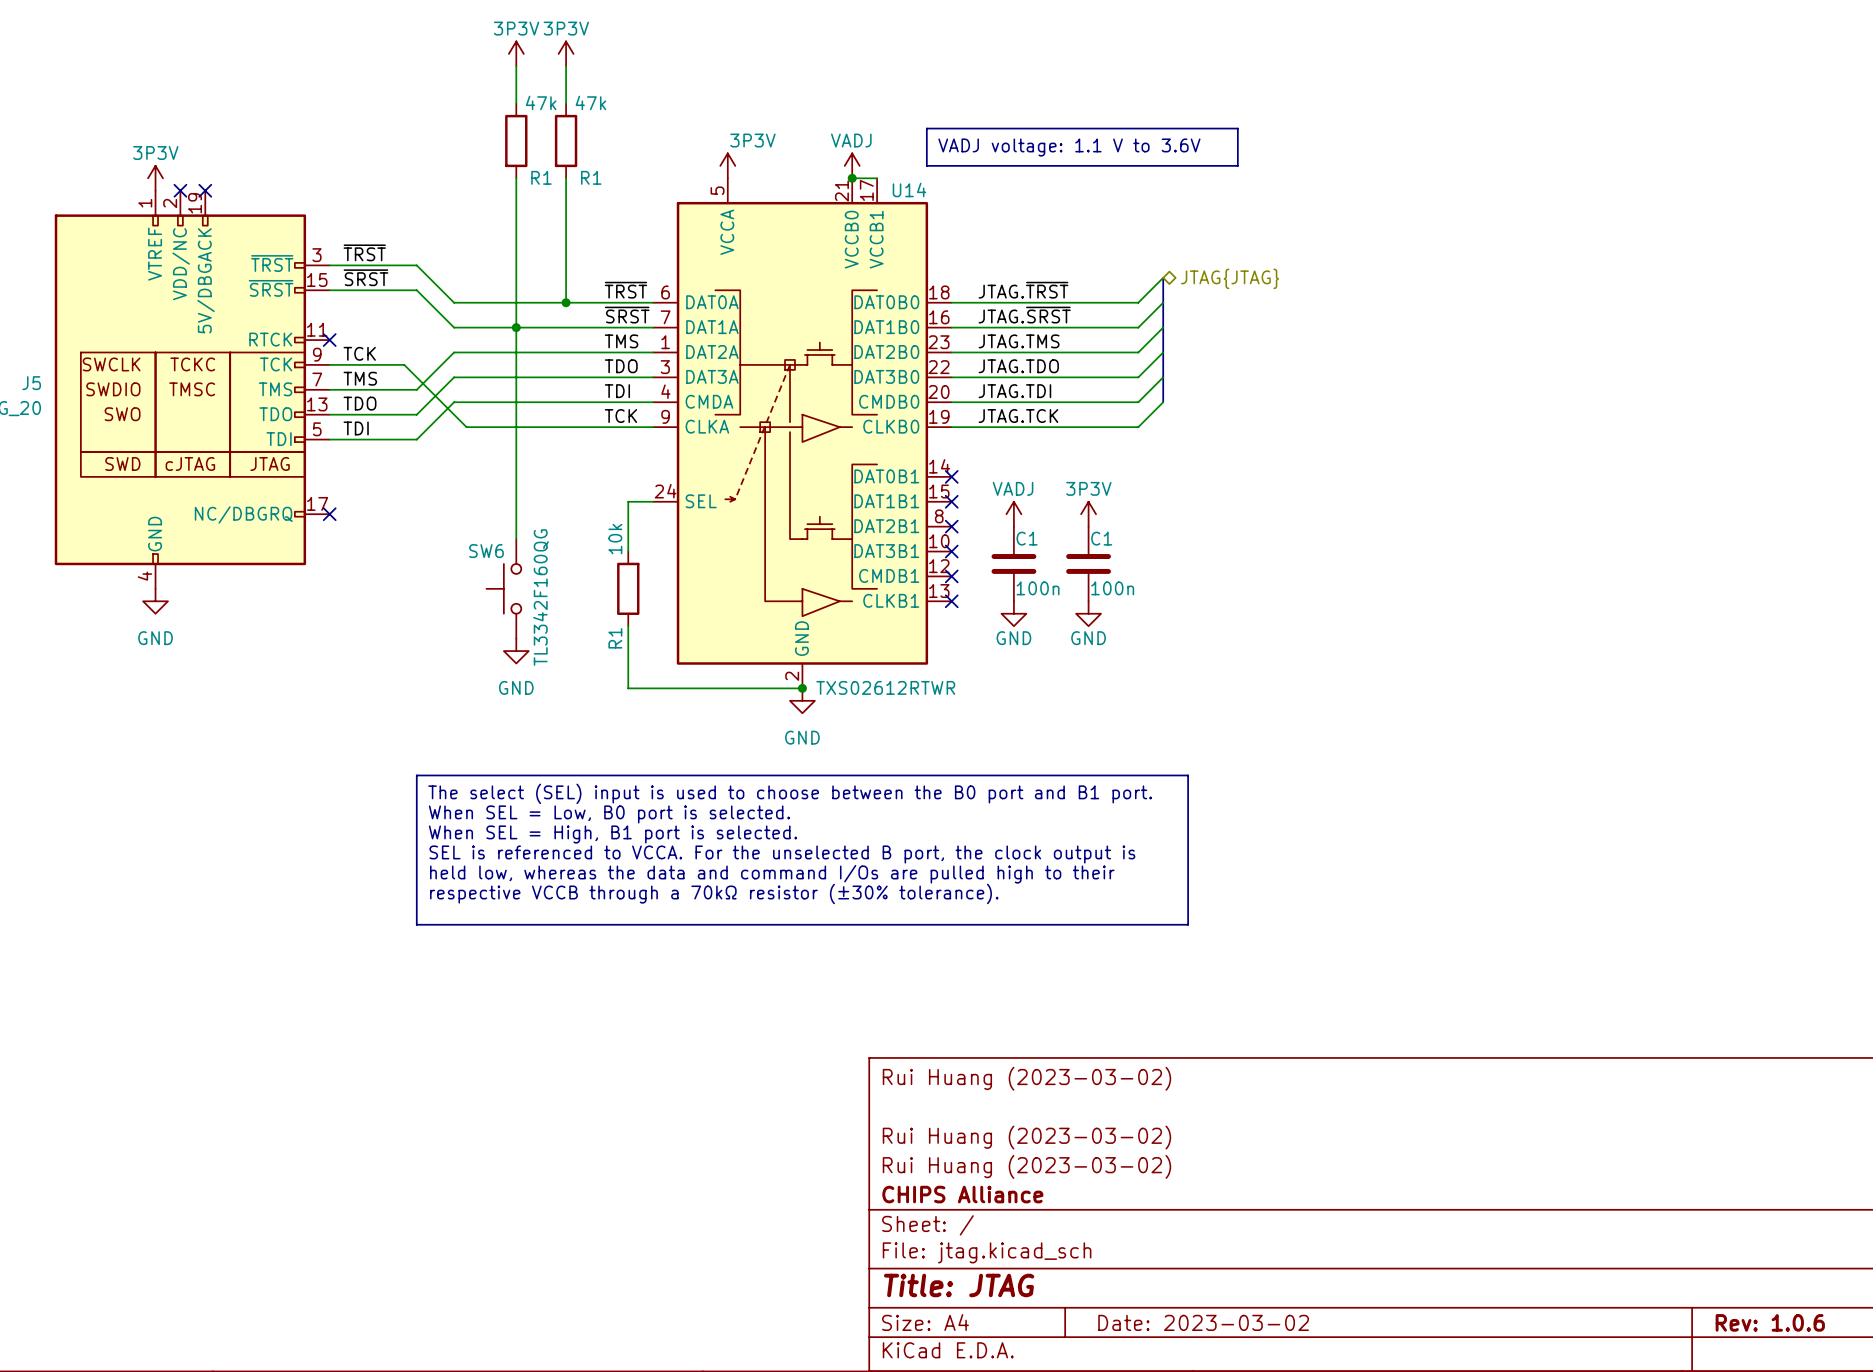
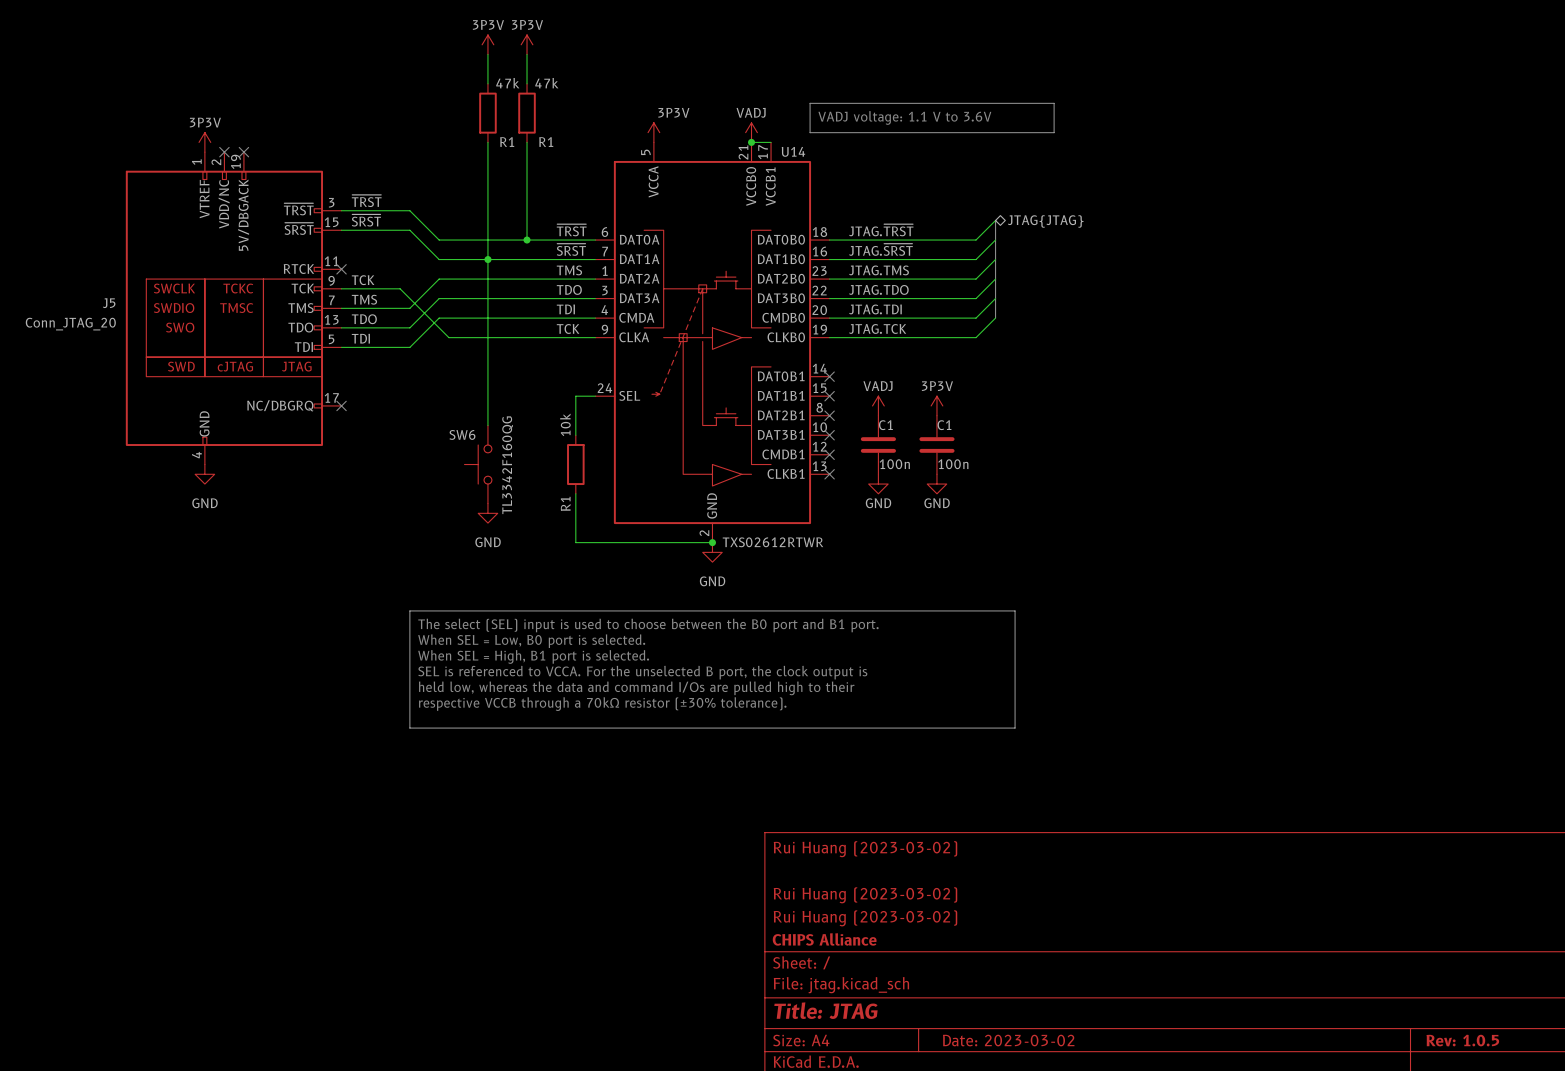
title block: Rev: 1.0.6 (1770, 1322) -> Rev: 1.0.5 (1462, 1040)

